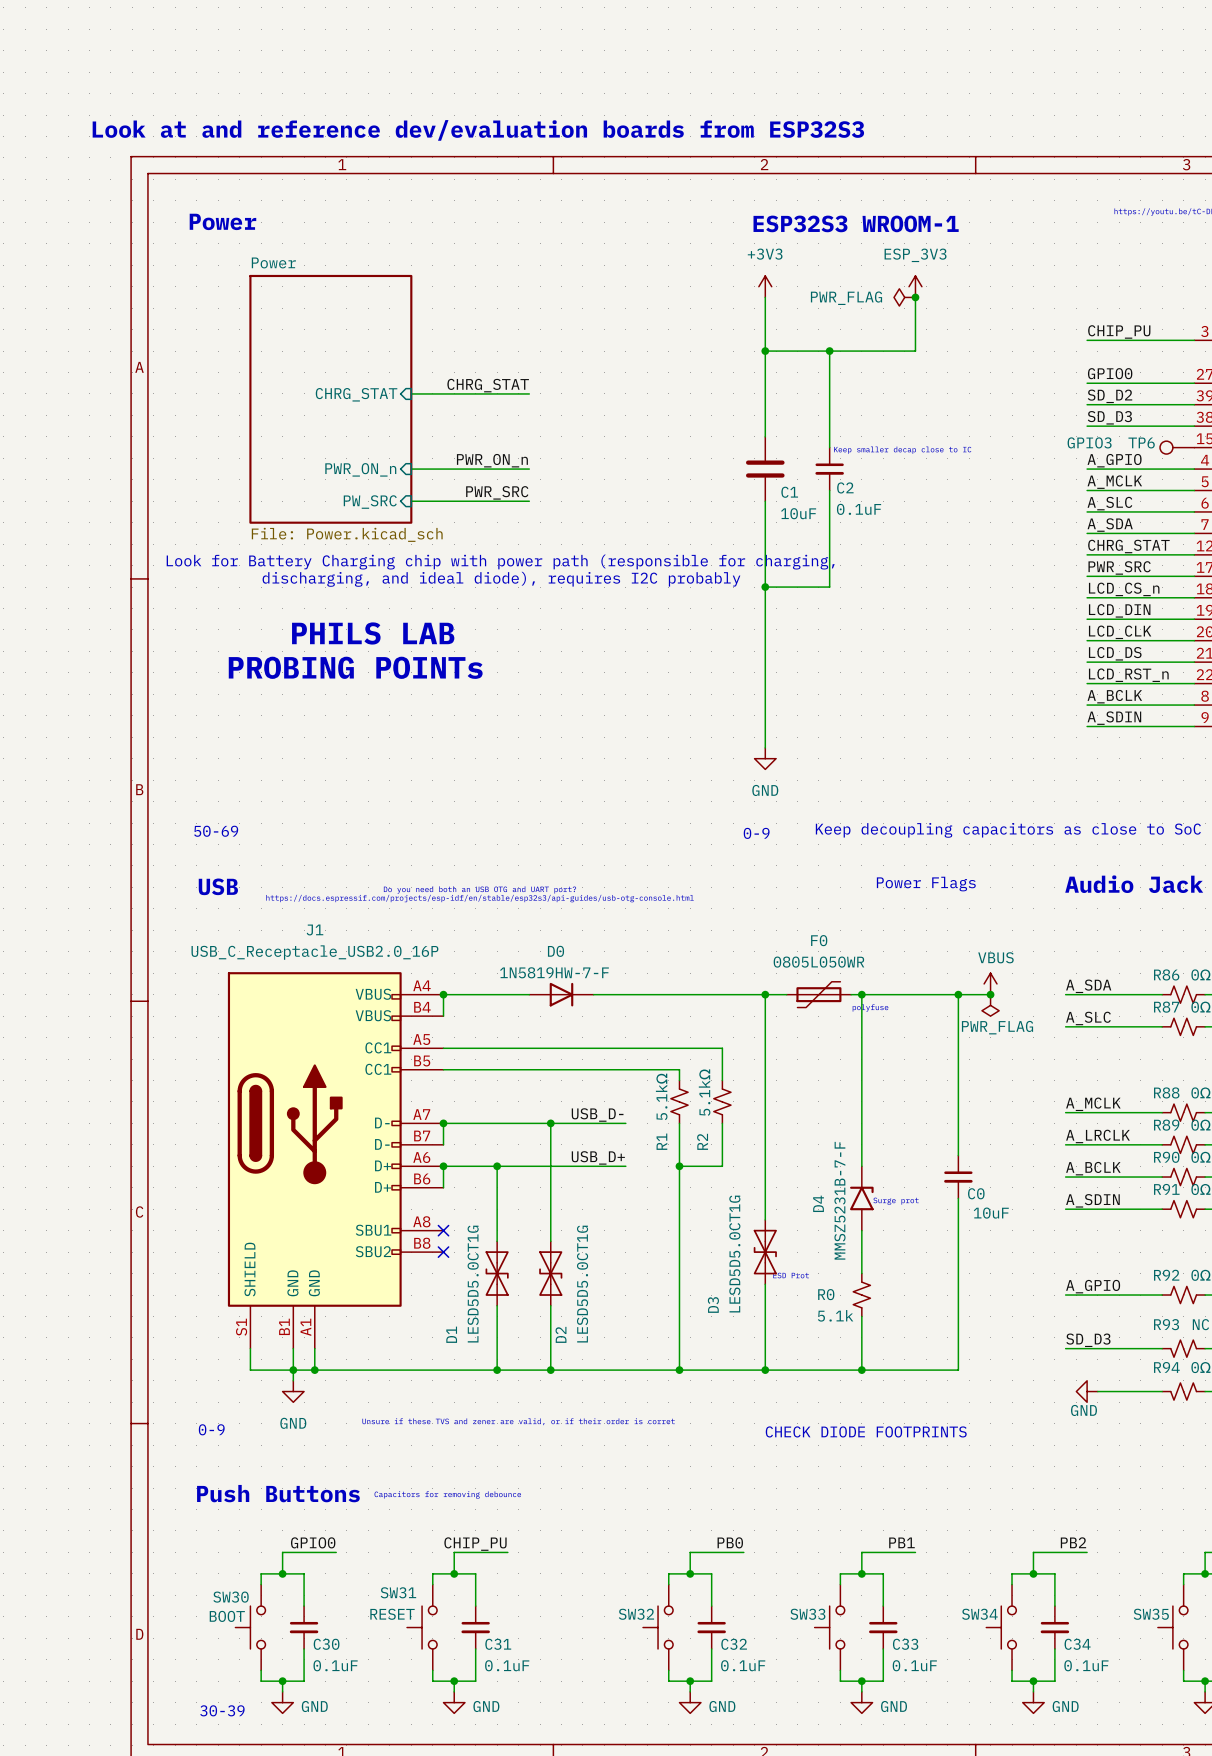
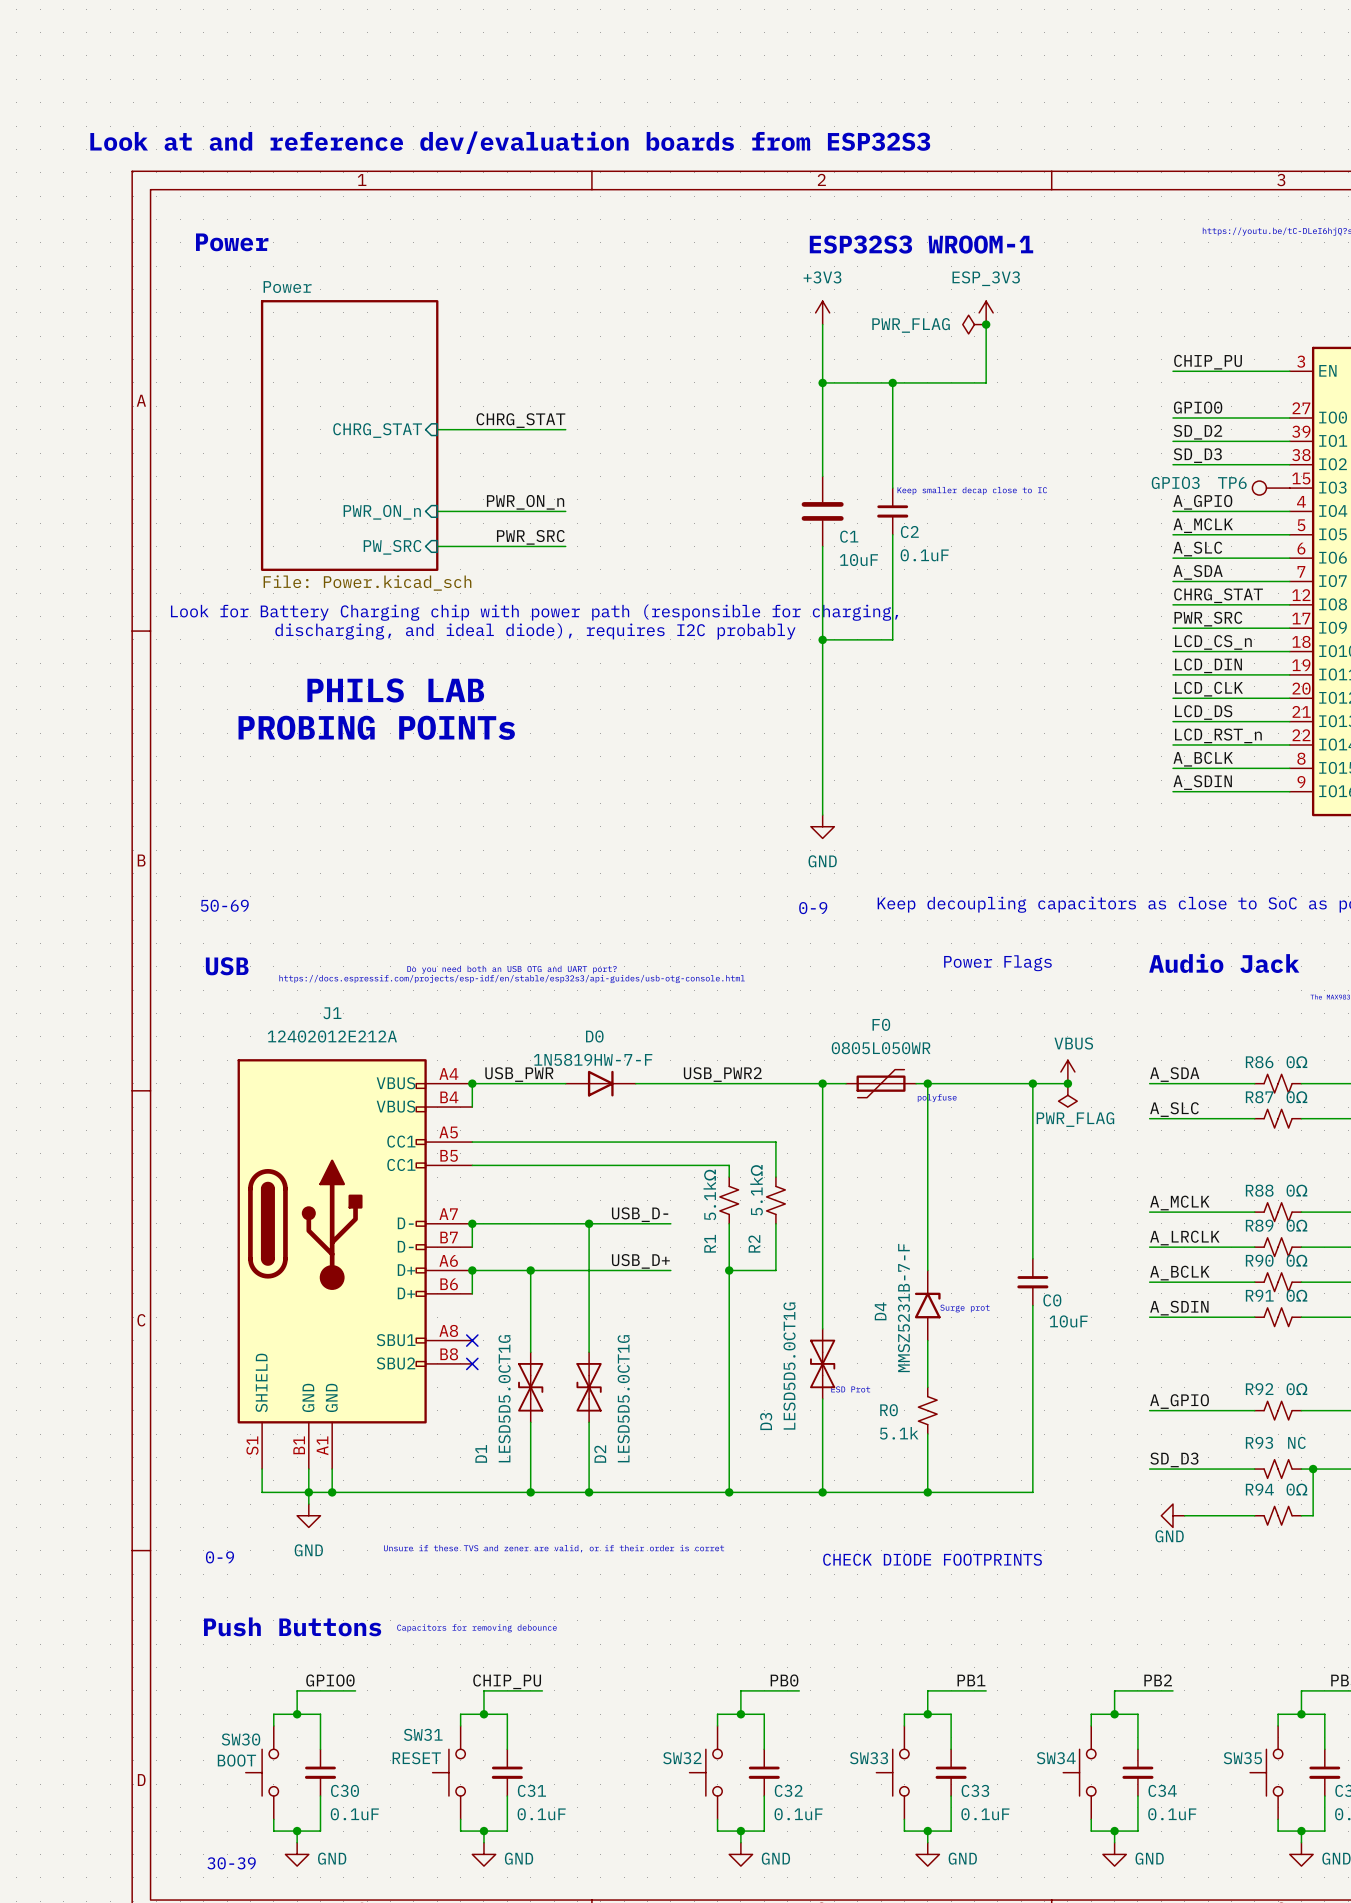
J1 value: USB_C_Receptacle_USB2.0_16P (314, 952) -> 12402012E212A (332, 1036)
label: none -> USB_PWR (519, 1074)
label: none -> USB_PWR2 (722, 1074)

